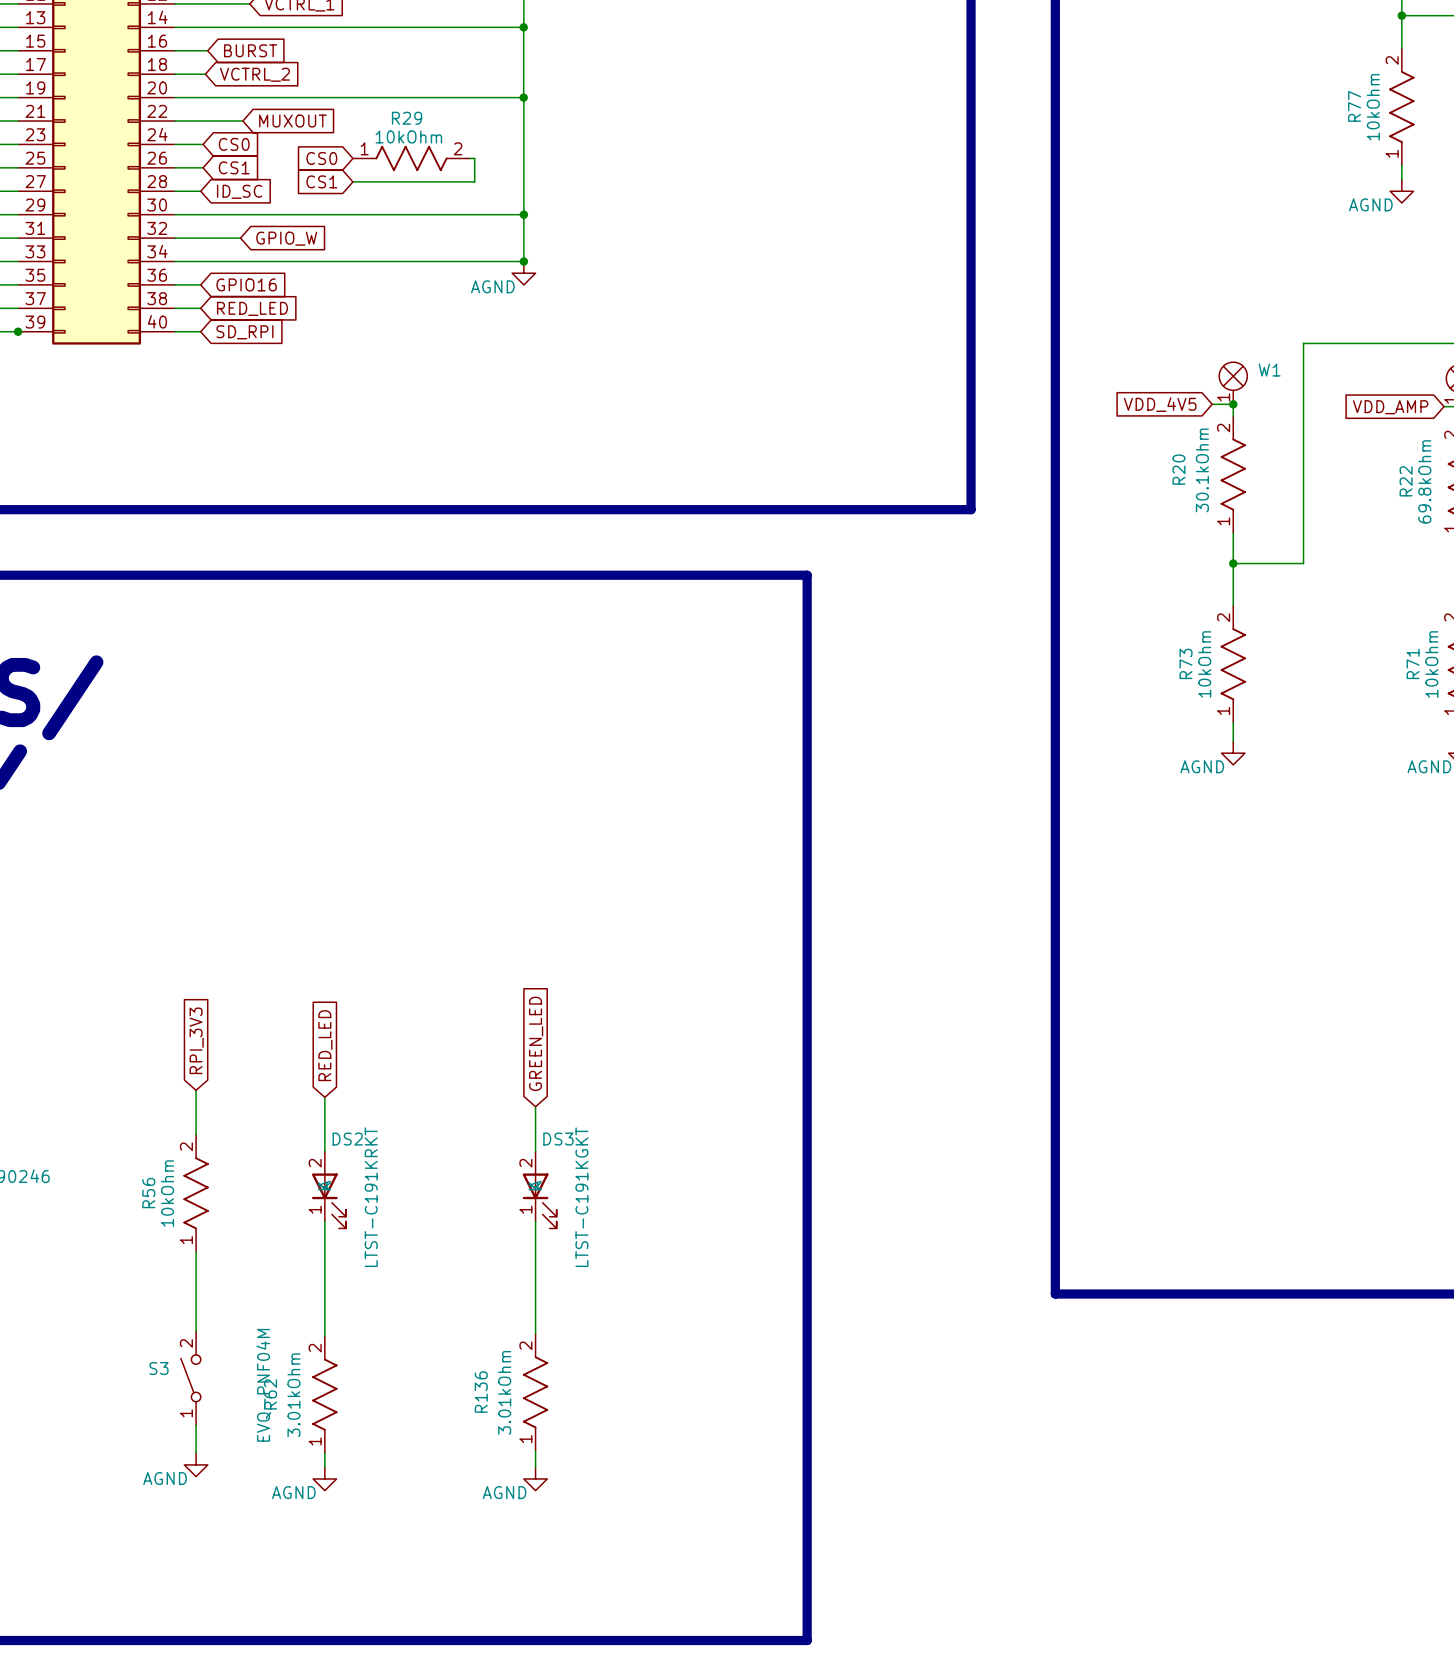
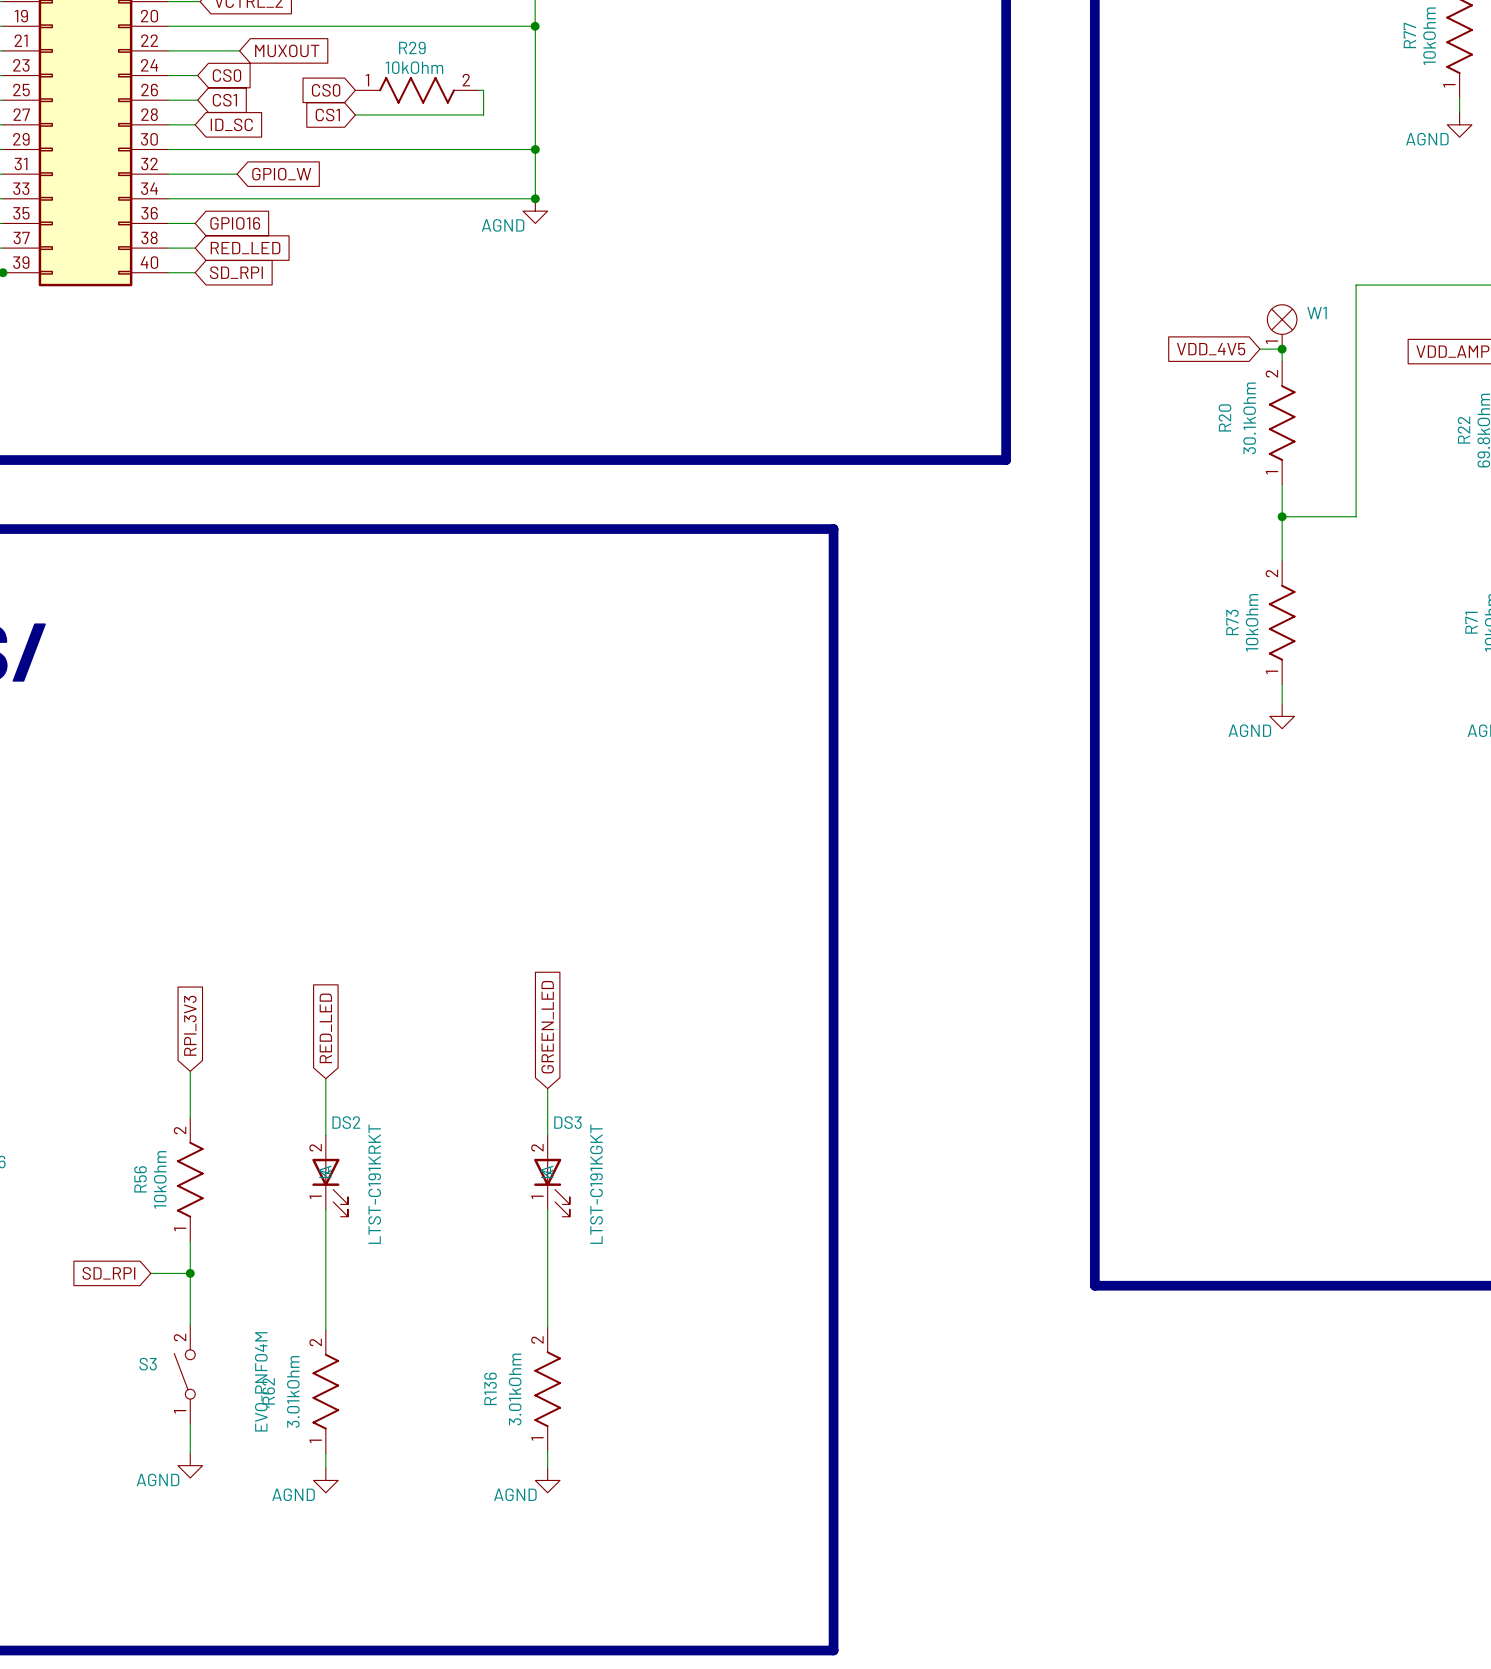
global label: none -> SD_RPI (108, 1273)
wire: none -> (150, 1273) (190, 1273)
junction: none -> (190, 1273)

